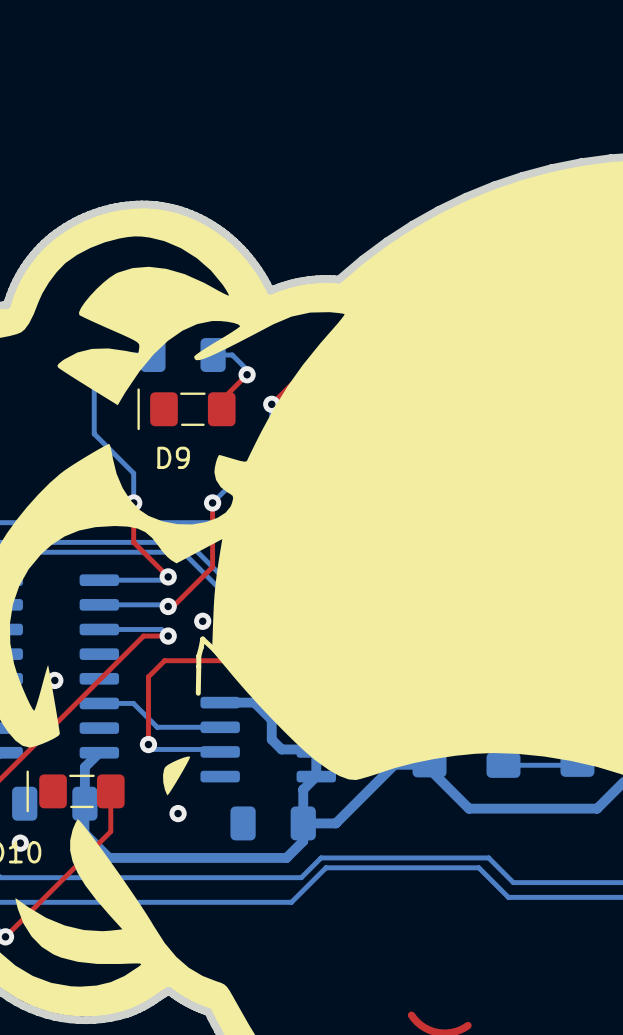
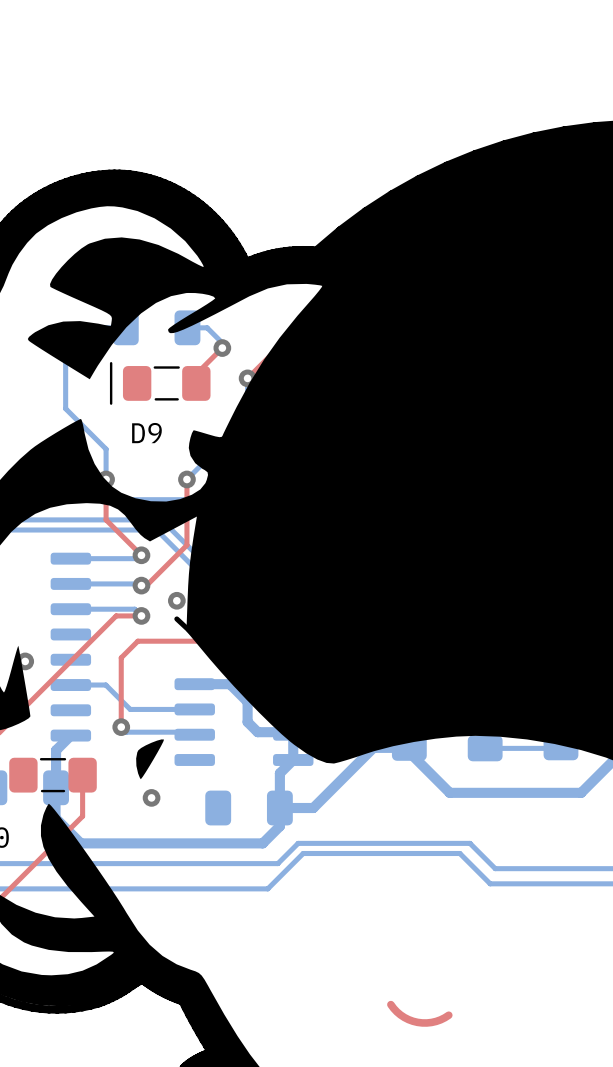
line: (203, 640) (202, 639) (198, 656) (198, 693) -> none

